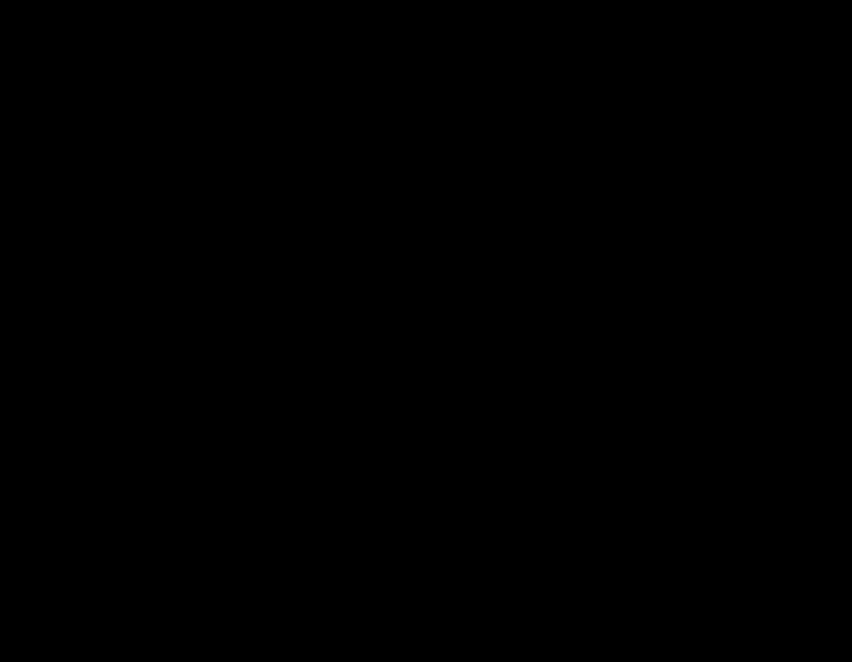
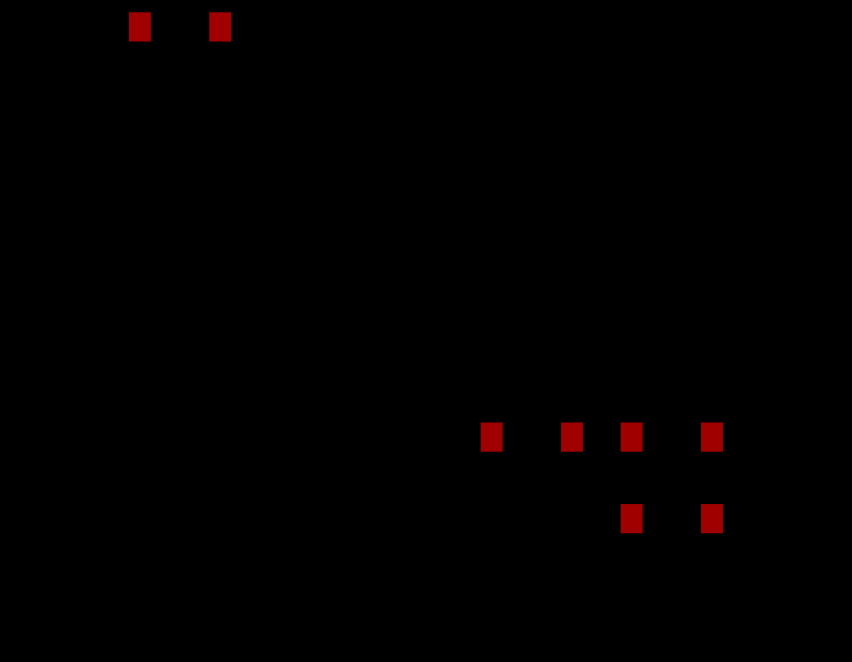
part: none -> (180, 26)
part: none -> (531, 437)
part: none -> (671, 437)
part: none -> (671, 518)

